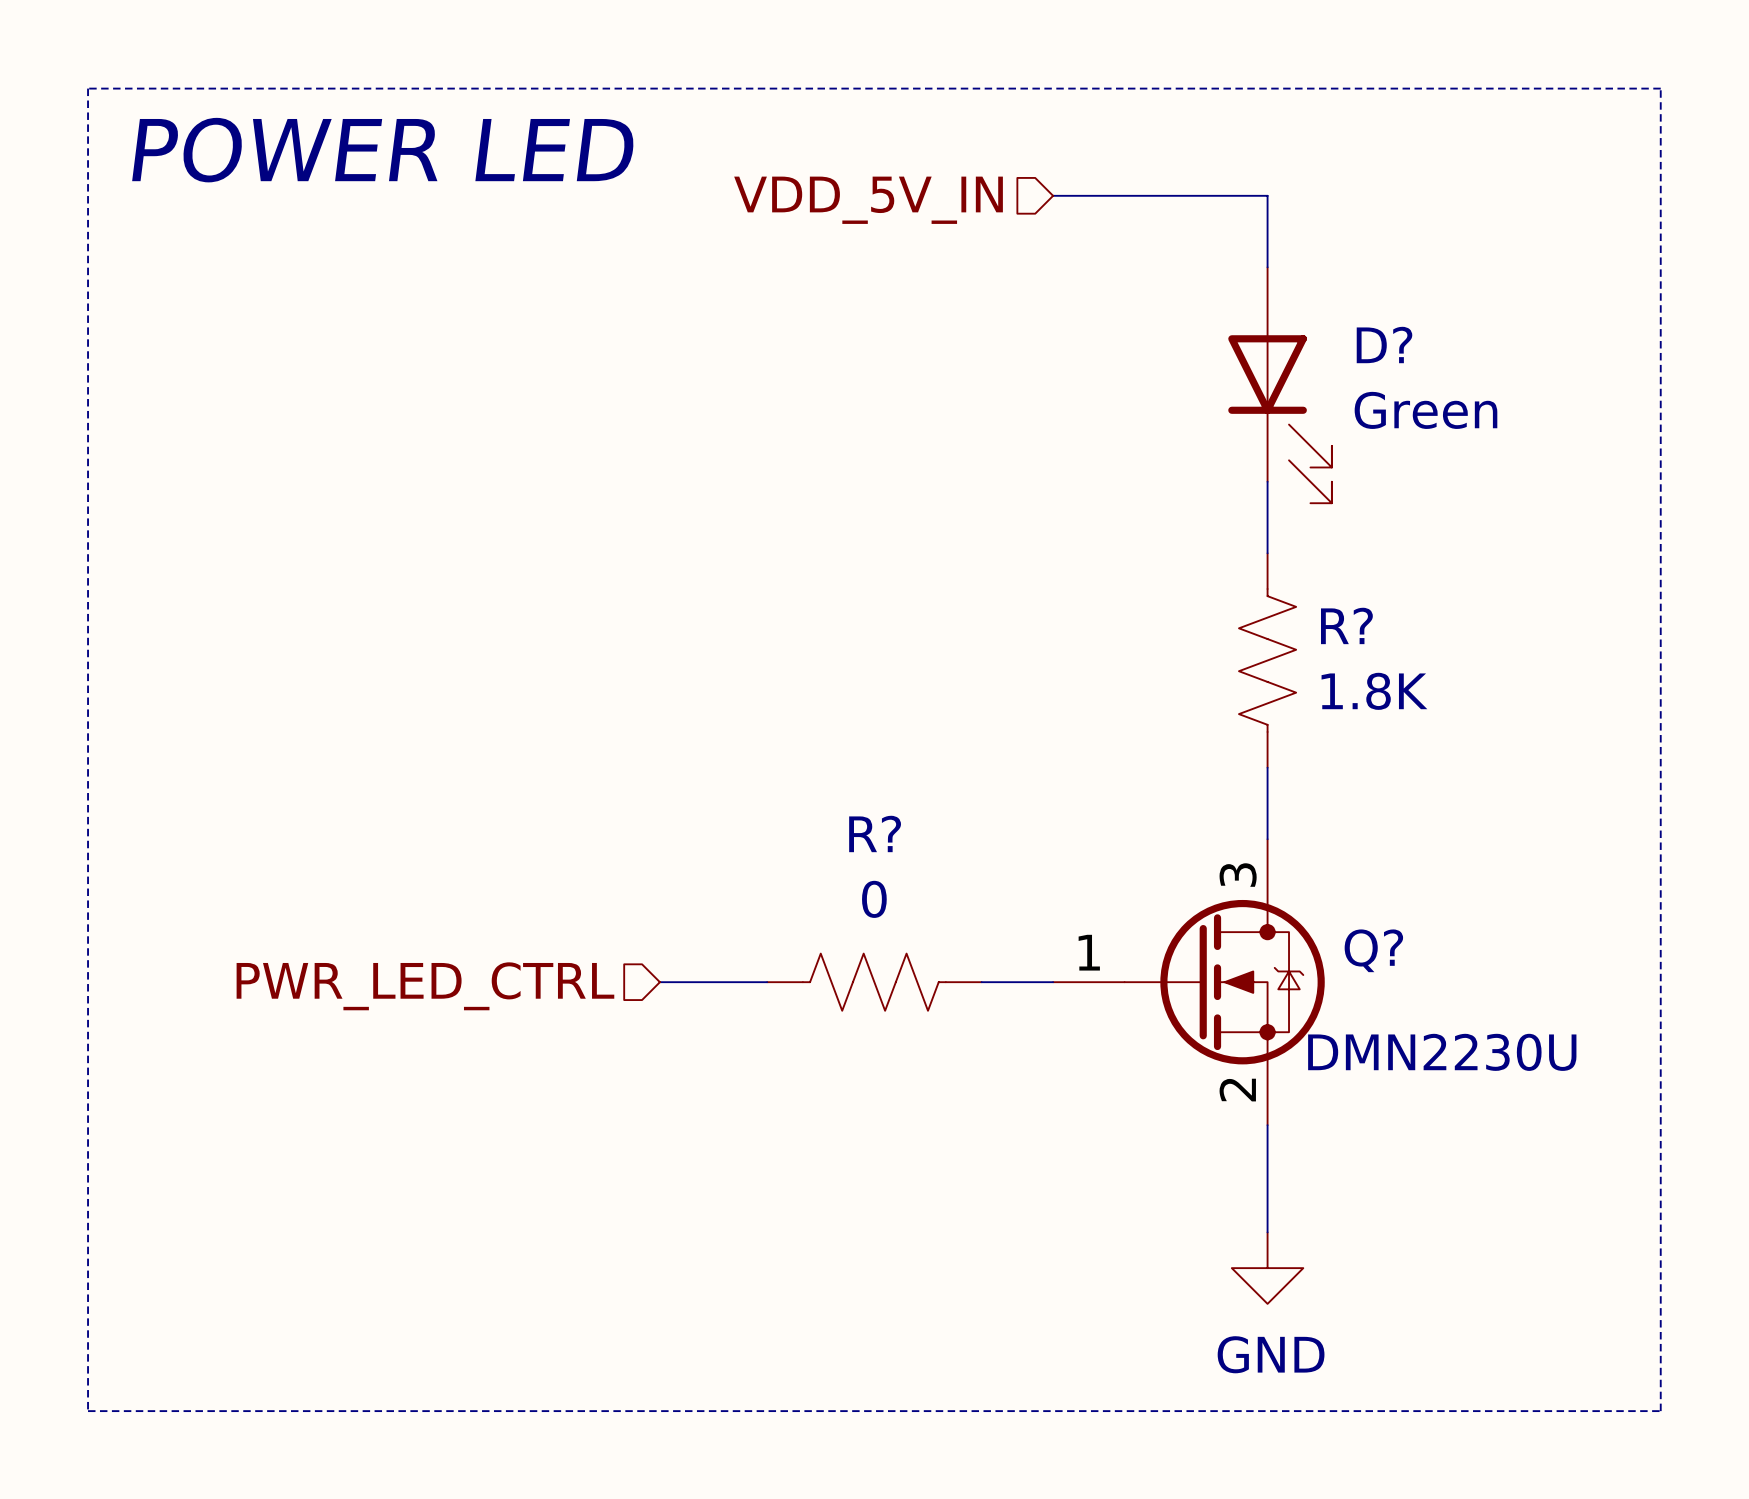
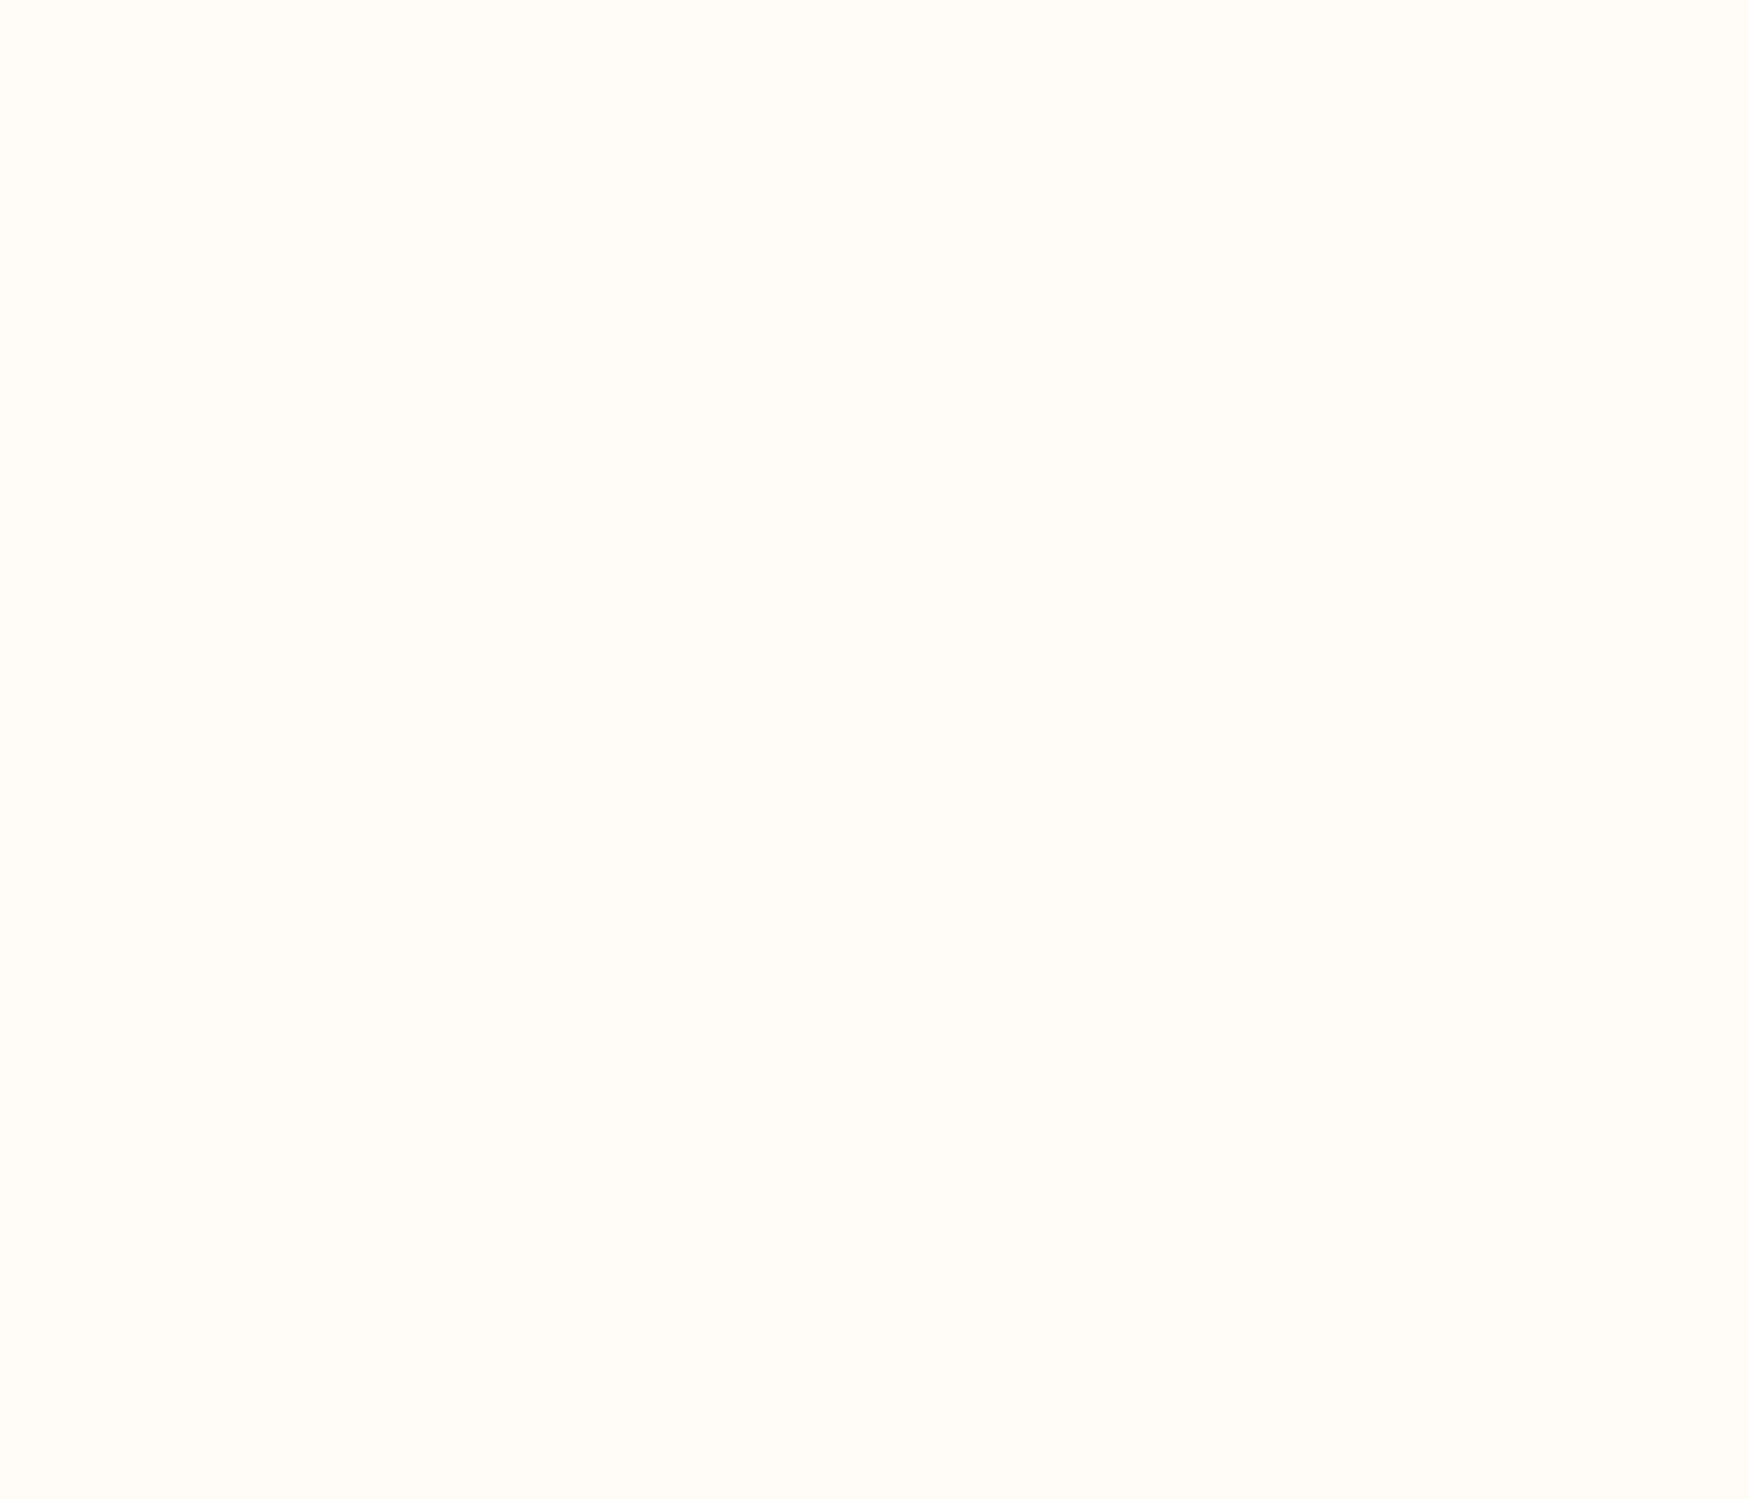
line: (88, 88) (1660, 88) (1660, 1411) (88, 1411) (88, 88) -> none
text: POWER LED (383, 150) -> none
wire: (1053, 195) (1267, 195) (1267, 267) -> none
hierarchical label: VDD_5V_IN (868, 200) -> none
D?: Green (1280, 385) -> none
wire: (1267, 481) (1267, 553) -> none
R?: 1.8K (1267, 660) -> none
wire: (1267, 767) (1267, 839) -> none
wire: (659, 982) (767, 982) -> none
R?: 0 (874, 982) -> none
wire: (981, 982) (1053, 982) -> none
Q?: DMN2230U (1188, 982) -> none
hierarchical label: PWR_LED_CTRL (425, 986) -> none
wire: (1267, 1125) (1267, 1232) -> none
power symbol: GND (1267, 1268) -> none

